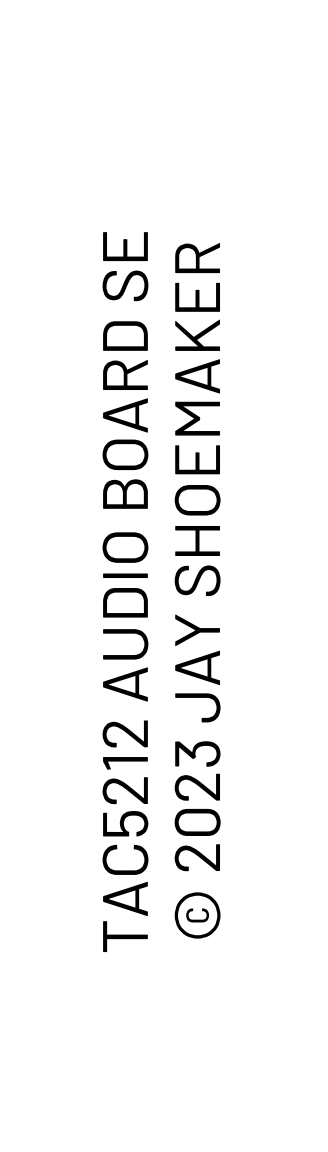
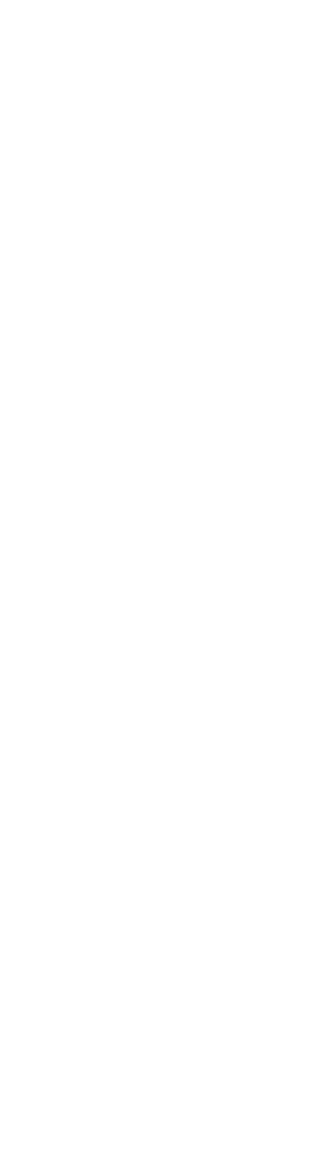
text: © 2023 JAY SHOEMAKER (197, 590) -> none
text: TAC5212 AUDIO BOARD SE (125, 592) -> none

